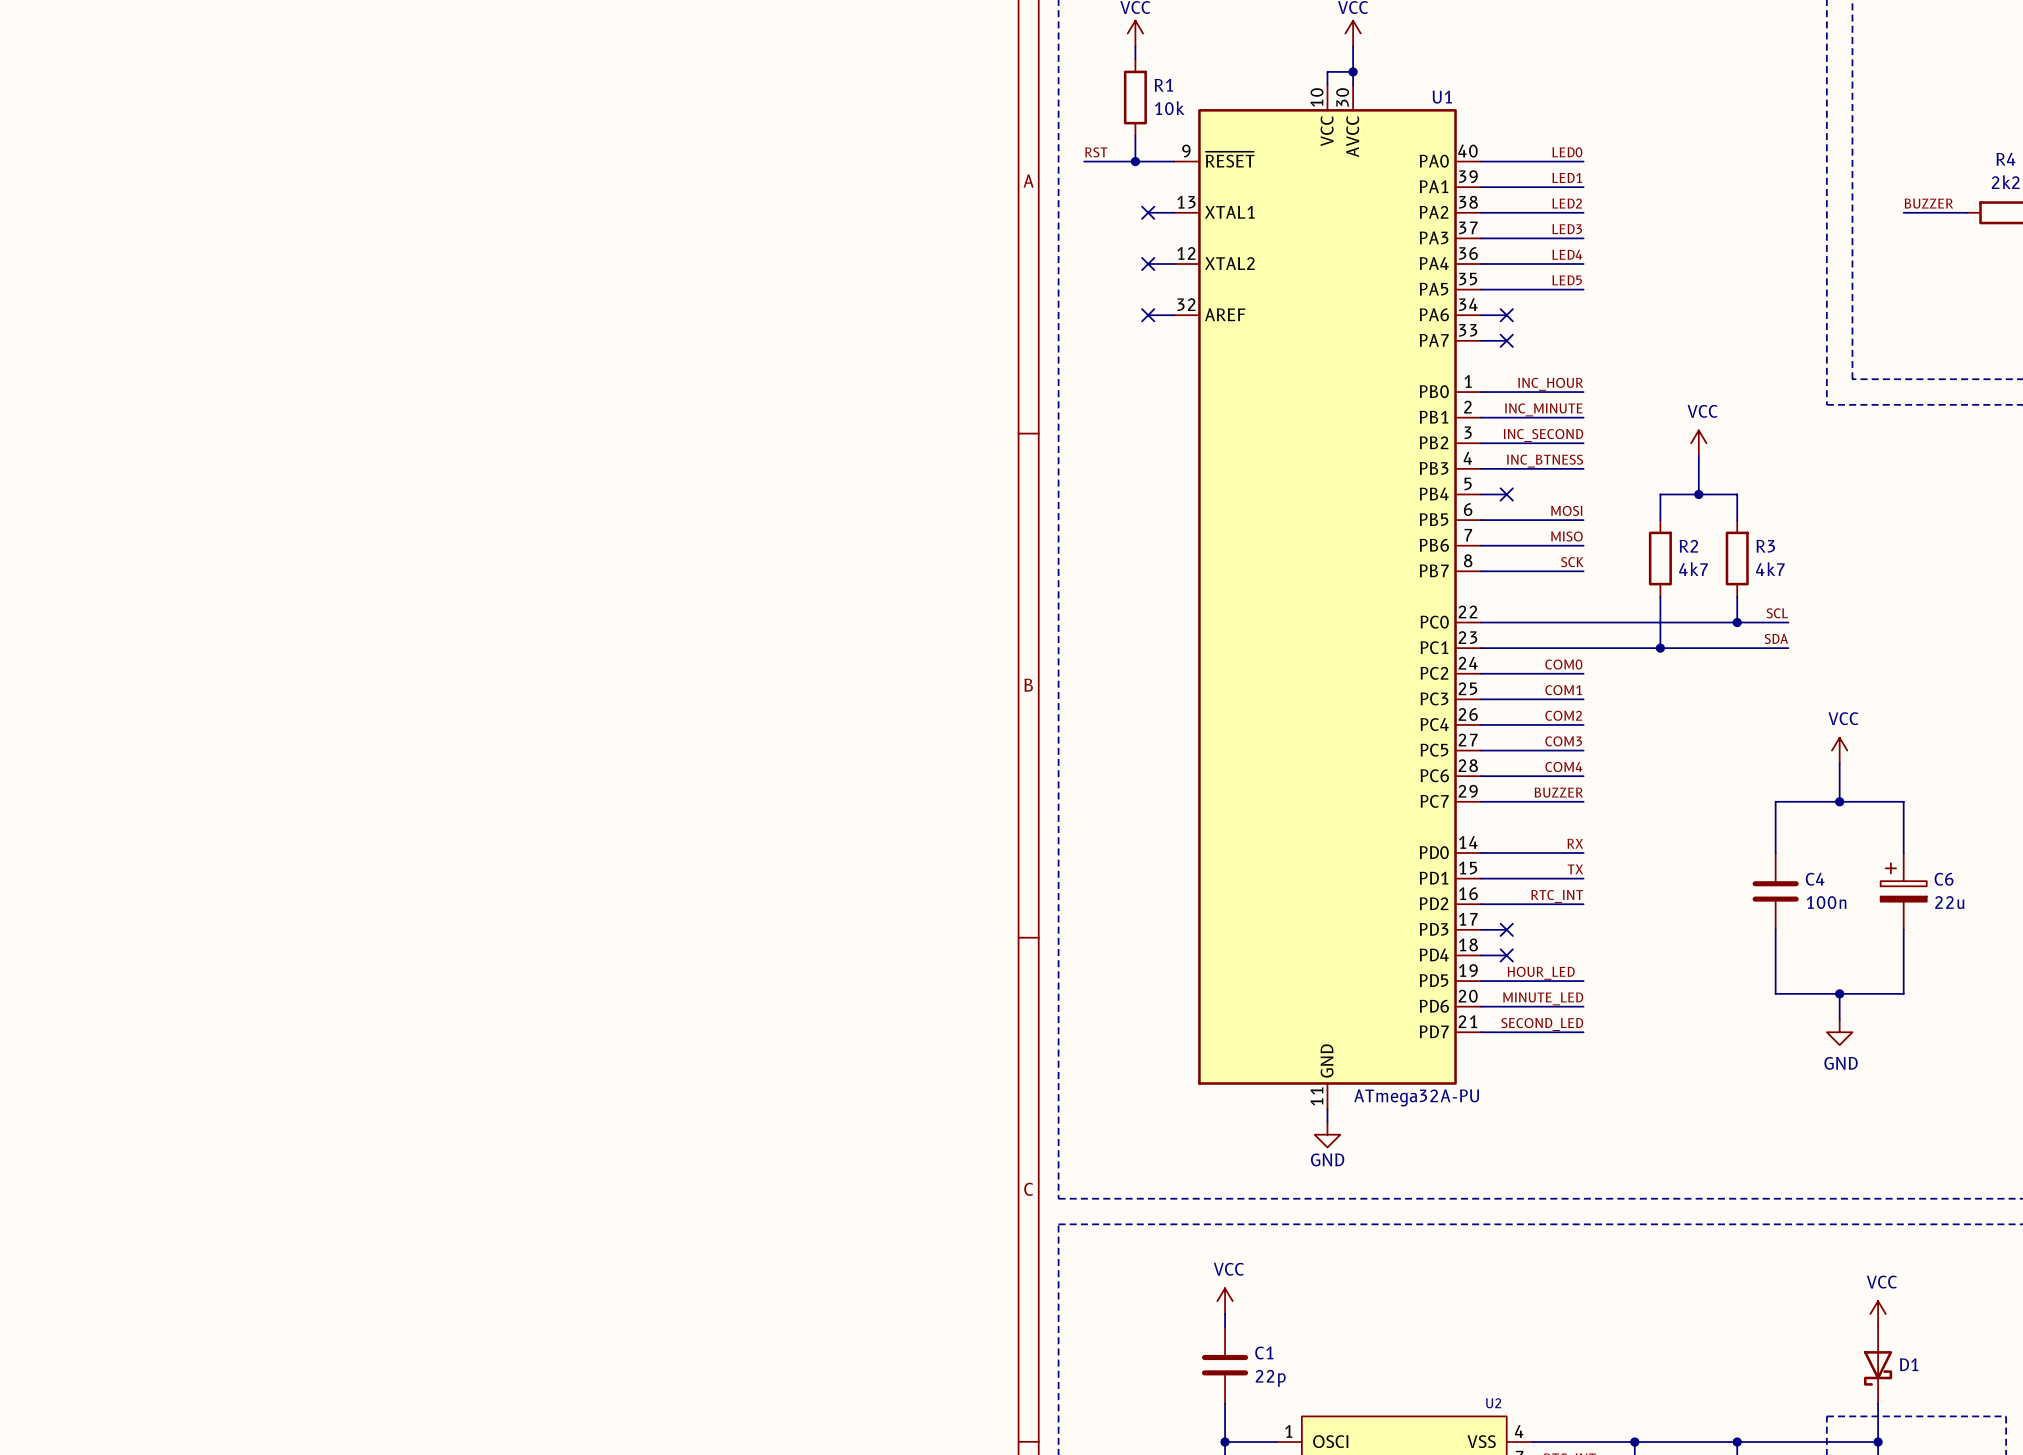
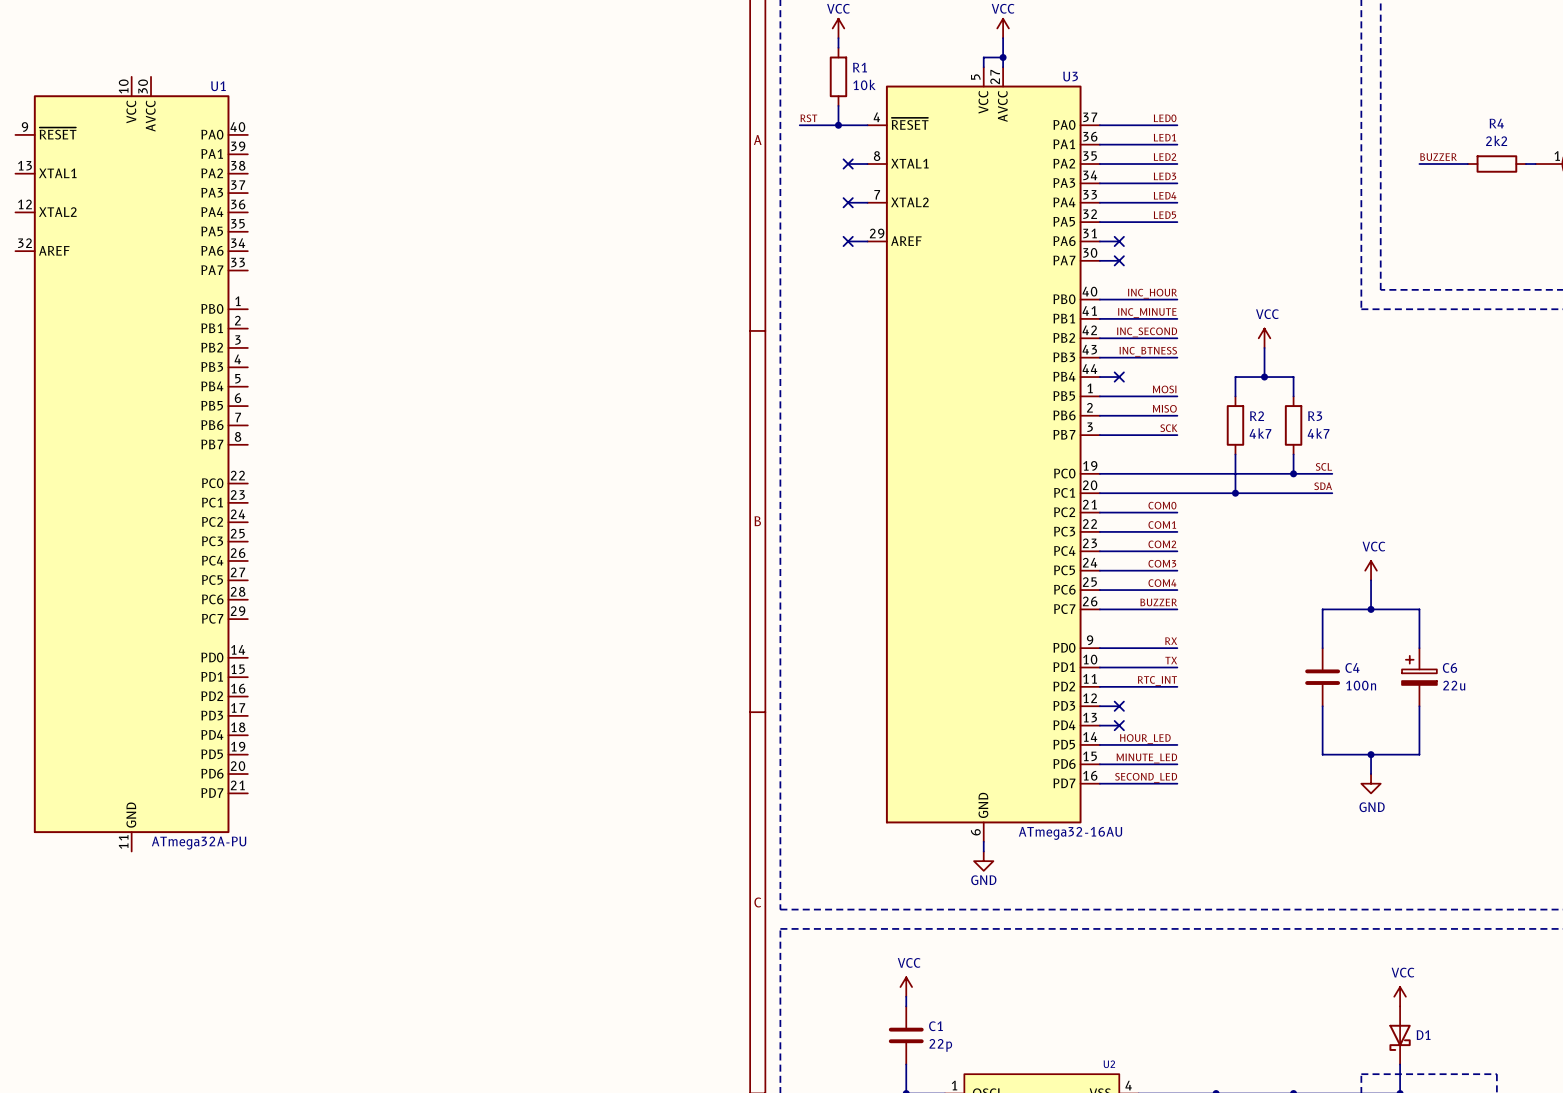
U1 position: (1327, 596) -> (131, 464)
U3: none -> ATmega32-16AU (983, 454)

